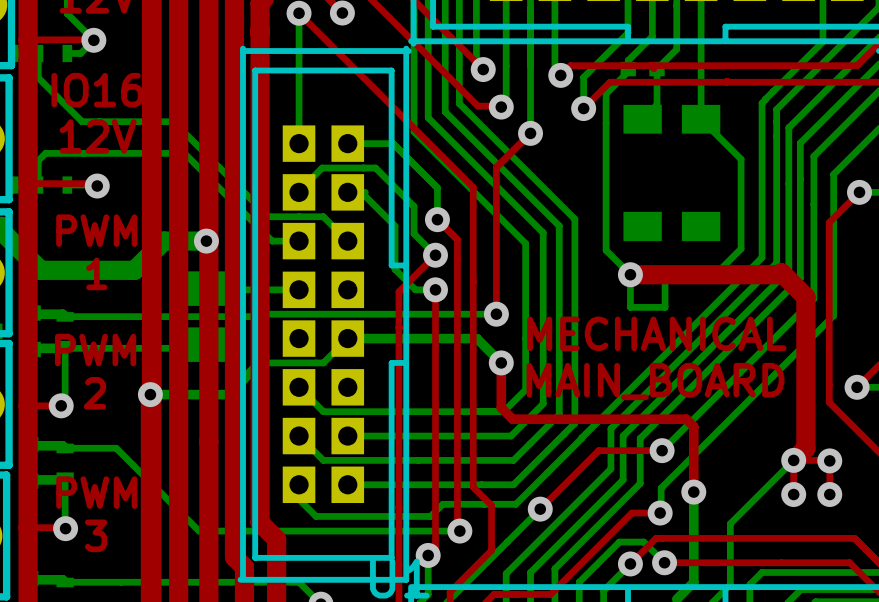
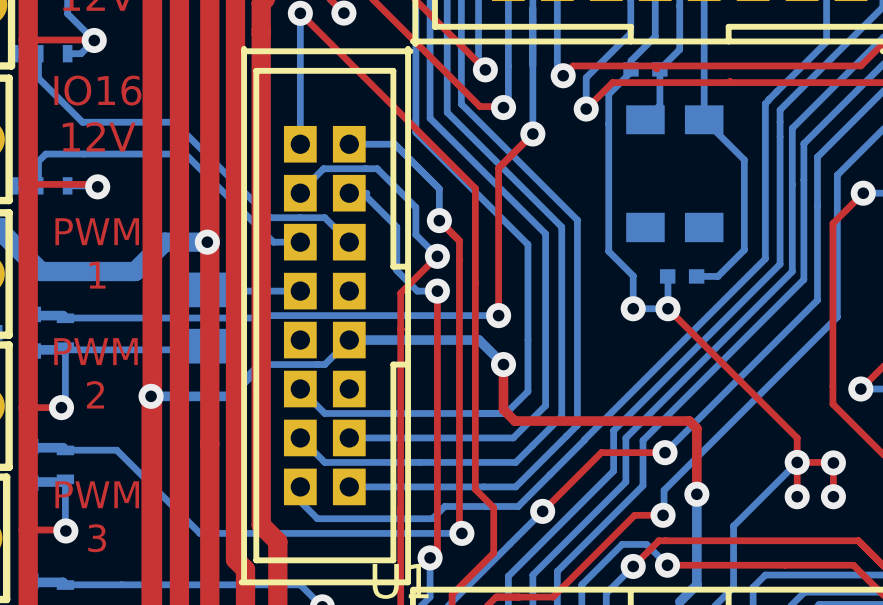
via: (630, 274) -> none
top track: (630, 275) (779, 274) (781, 272) (805, 297) (805, 448) (793, 460) -> (667, 308) (797, 437) (797, 462)
via: none -> (633, 308)
via: none -> (667, 308)
text: MECHANICAL (656, 333) -> none
text: MAIN_BOARD (655, 381) -> none

